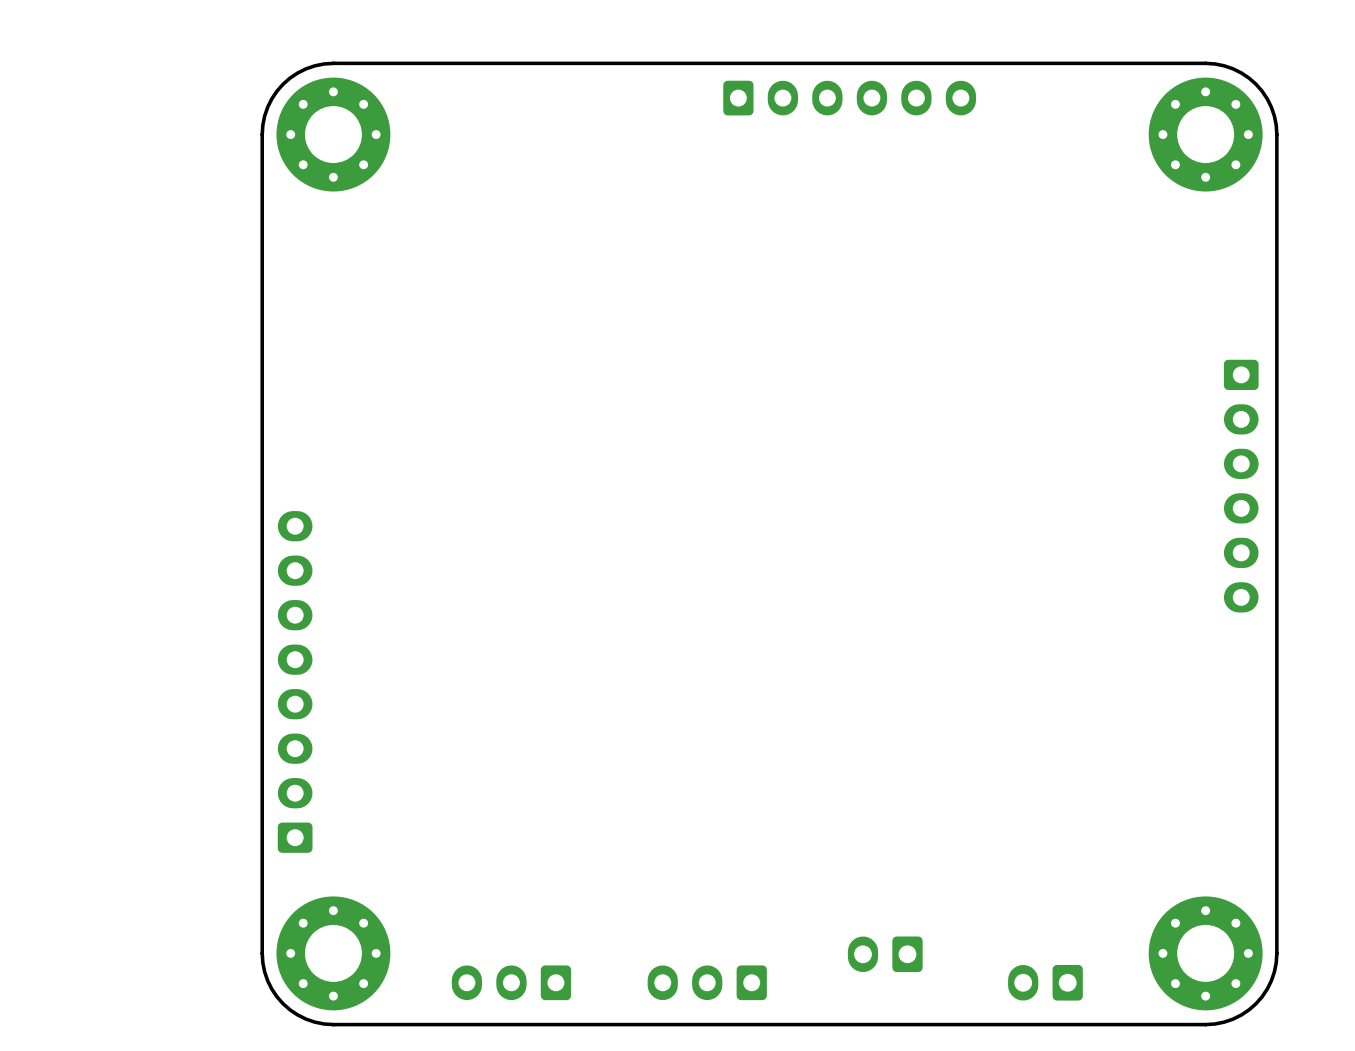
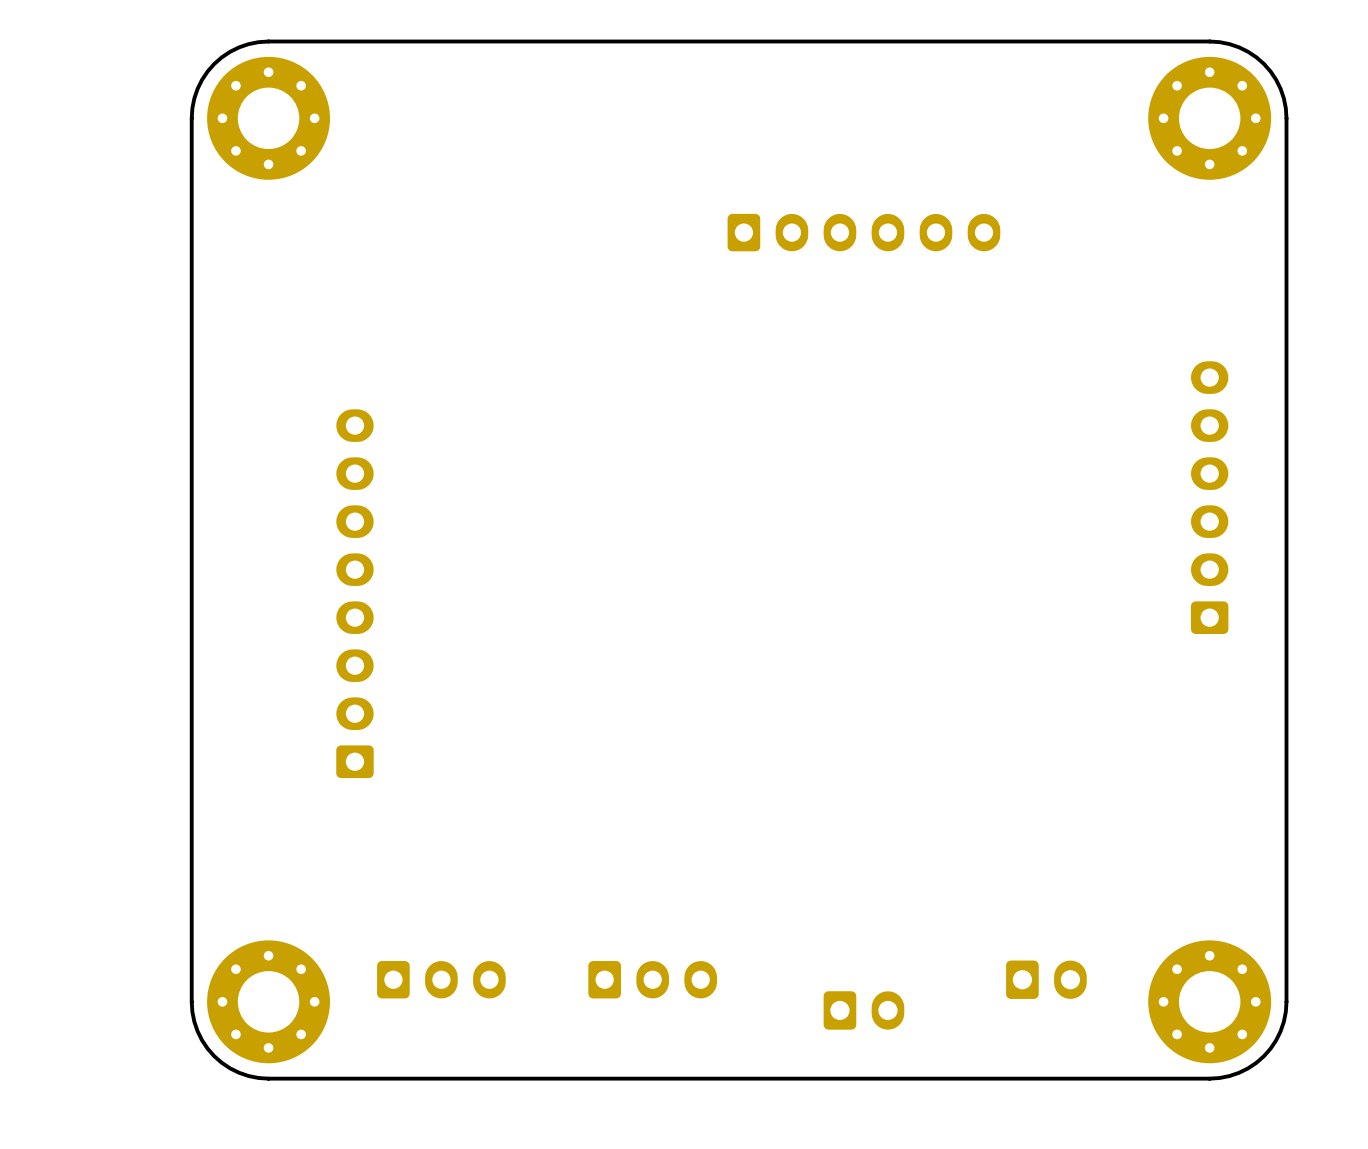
part position: (849, 98) -> (863, 232)
part rotation: 0° (1241, 486) -> 180° (1209, 497)
part position: (295, 681) -> (354, 593)
part rotation: 0° (885, 954) -> 180° (863, 1010)
part rotation: 0° (511, 982) -> 180° (441, 979)
part rotation: 0° (707, 982) -> 180° (652, 979)
part rotation: 0° (1045, 982) -> 180° (1046, 979)
part position: (1045, 982) -> (1046, 979)

